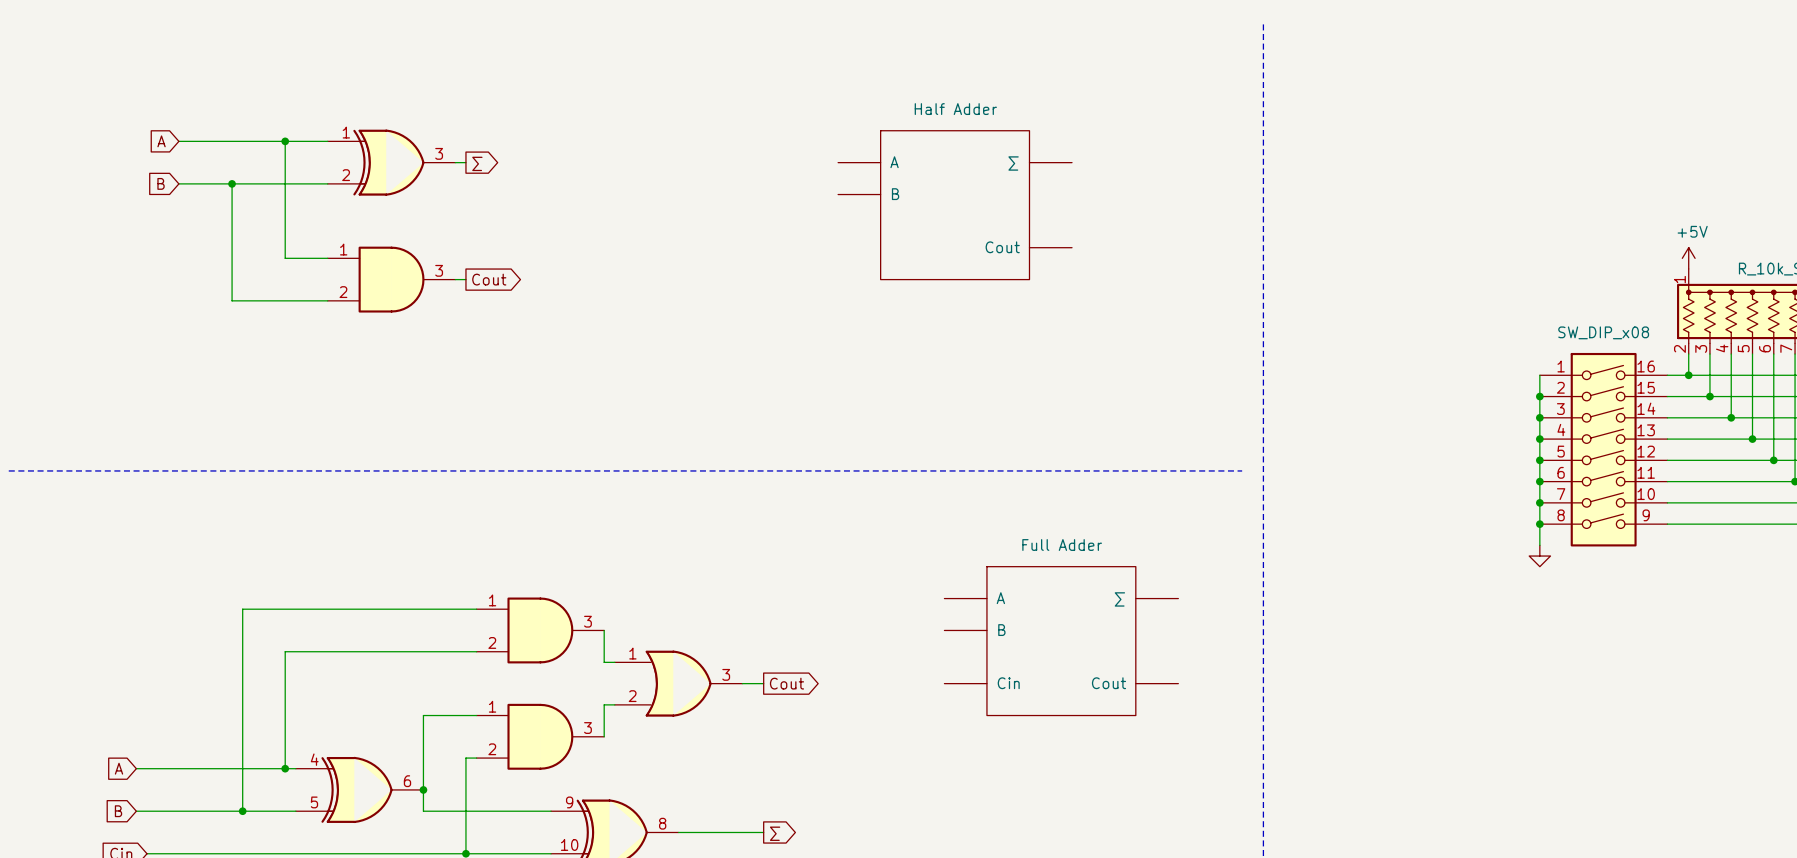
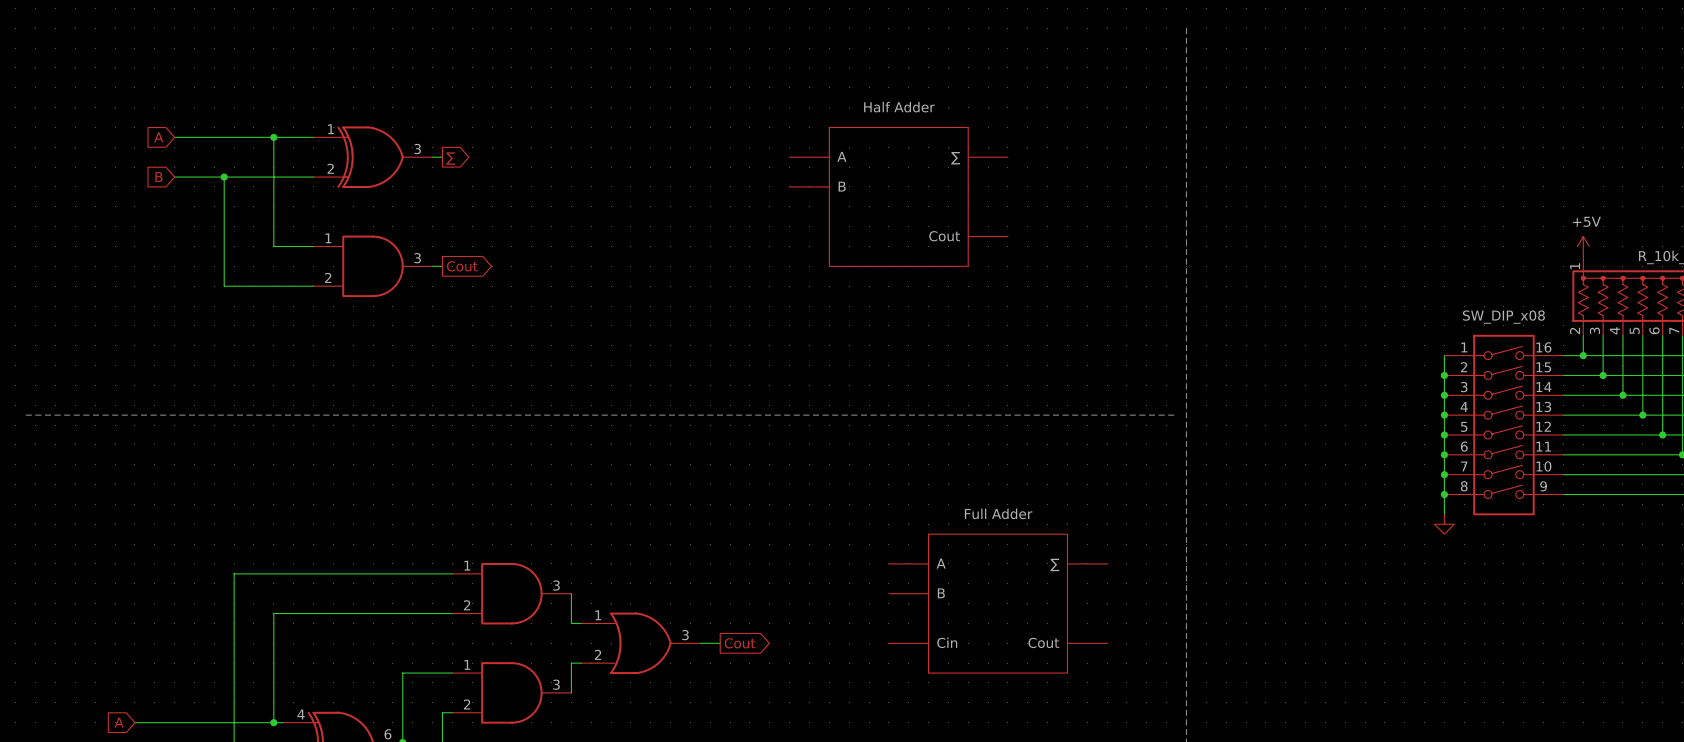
line: (8, 470) (1242, 470) -> (25, 415) (1176, 415)

